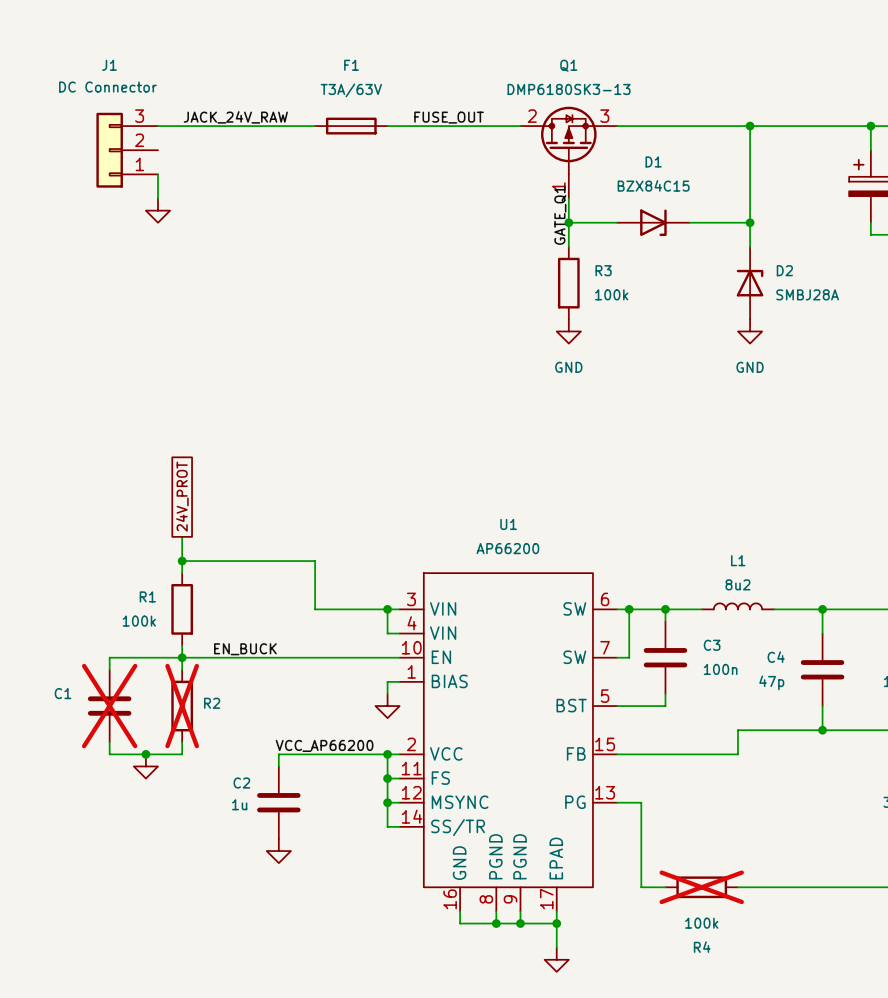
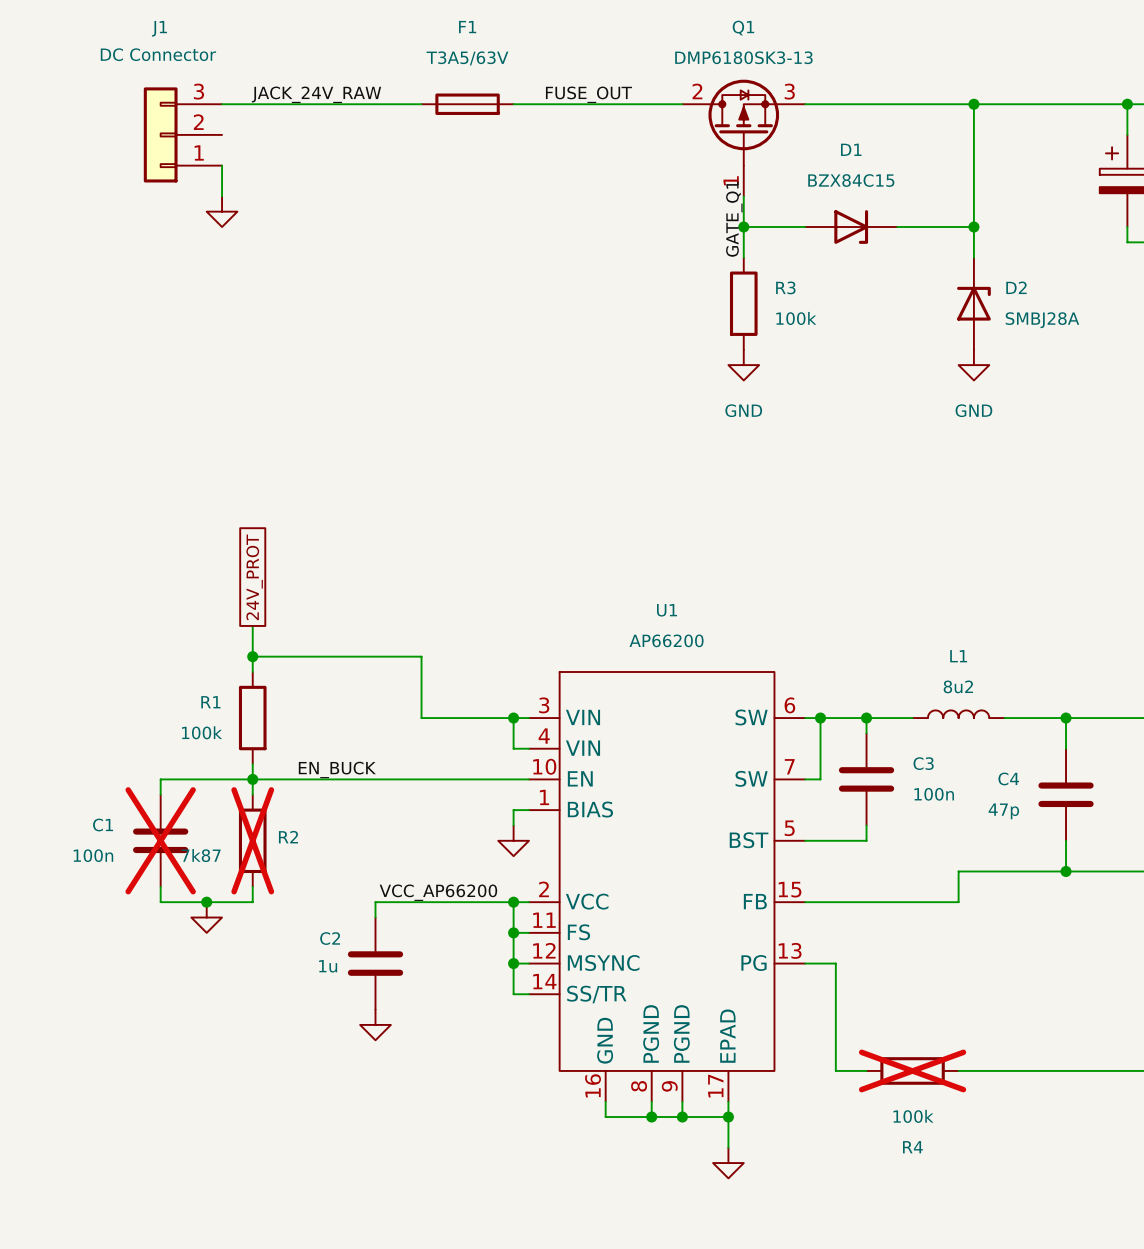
F1 value: T3A/63V (351, 90) -> T3A5/63V (467, 58)
C1 value: none -> 100n (93, 855)
R2 value: none -> 7k87 (201, 855)

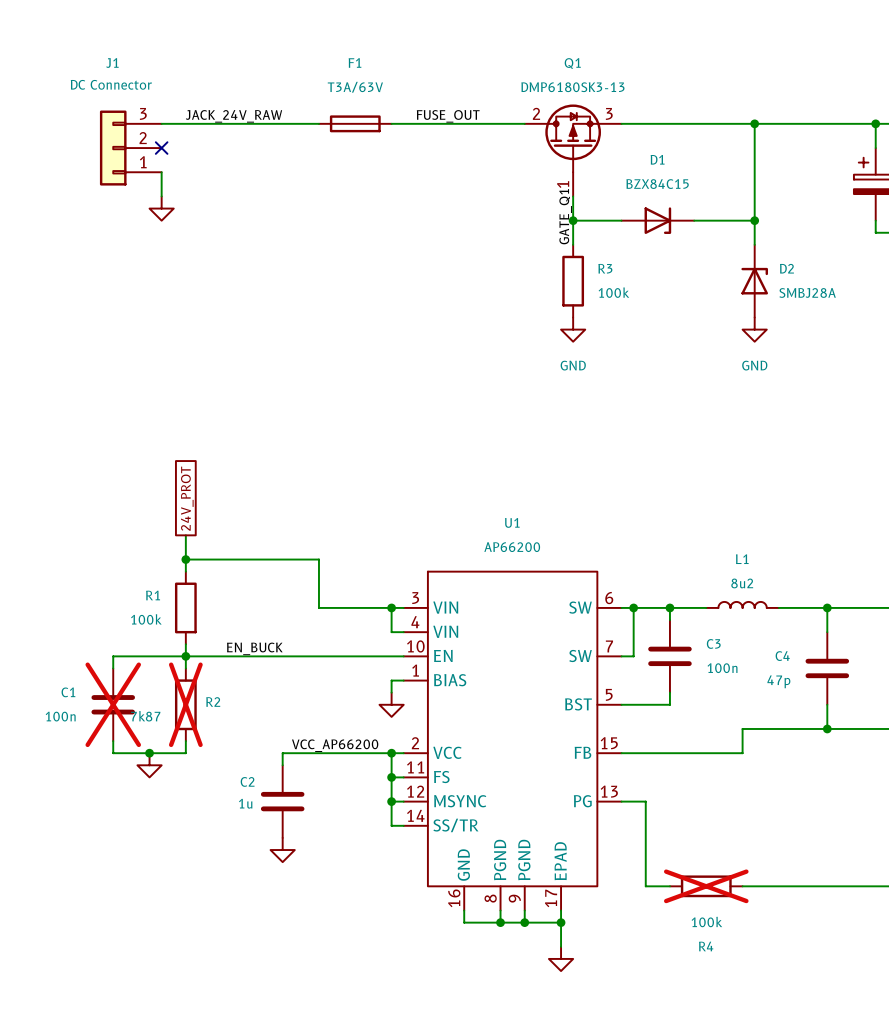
F1 value: T3A5/63V (467, 58) -> T3A/63V (355, 87)
no-connect mark: none -> (161, 148)

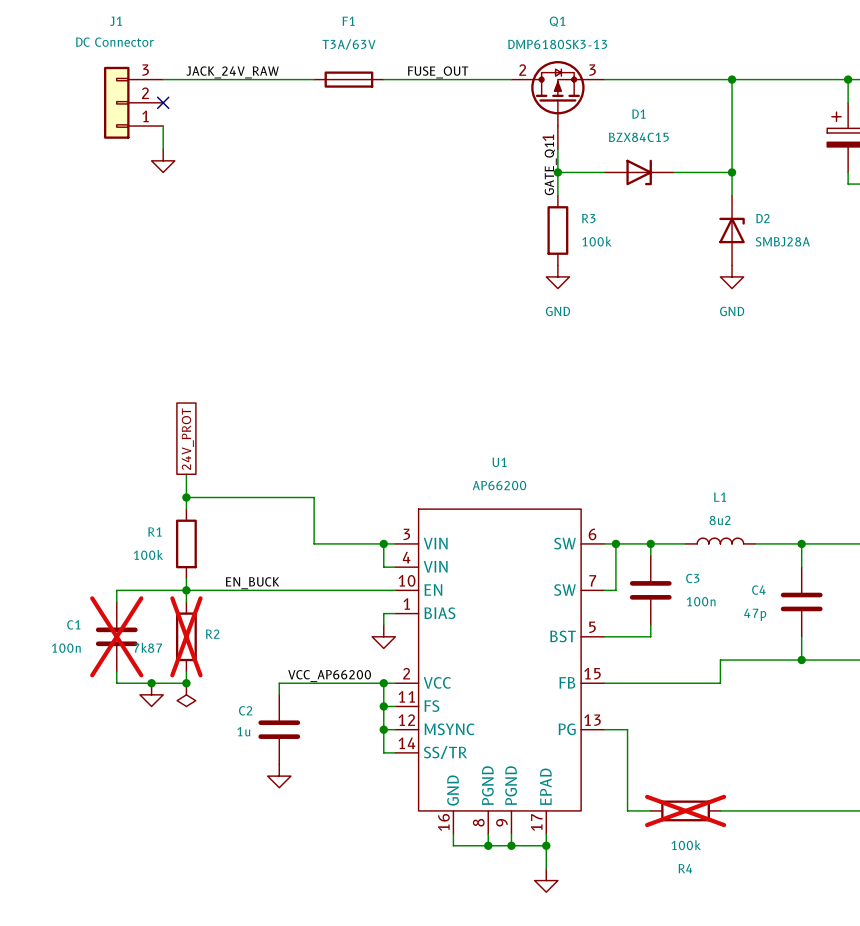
junction: none -> (186, 683)
power symbol: none -> (186, 694)

